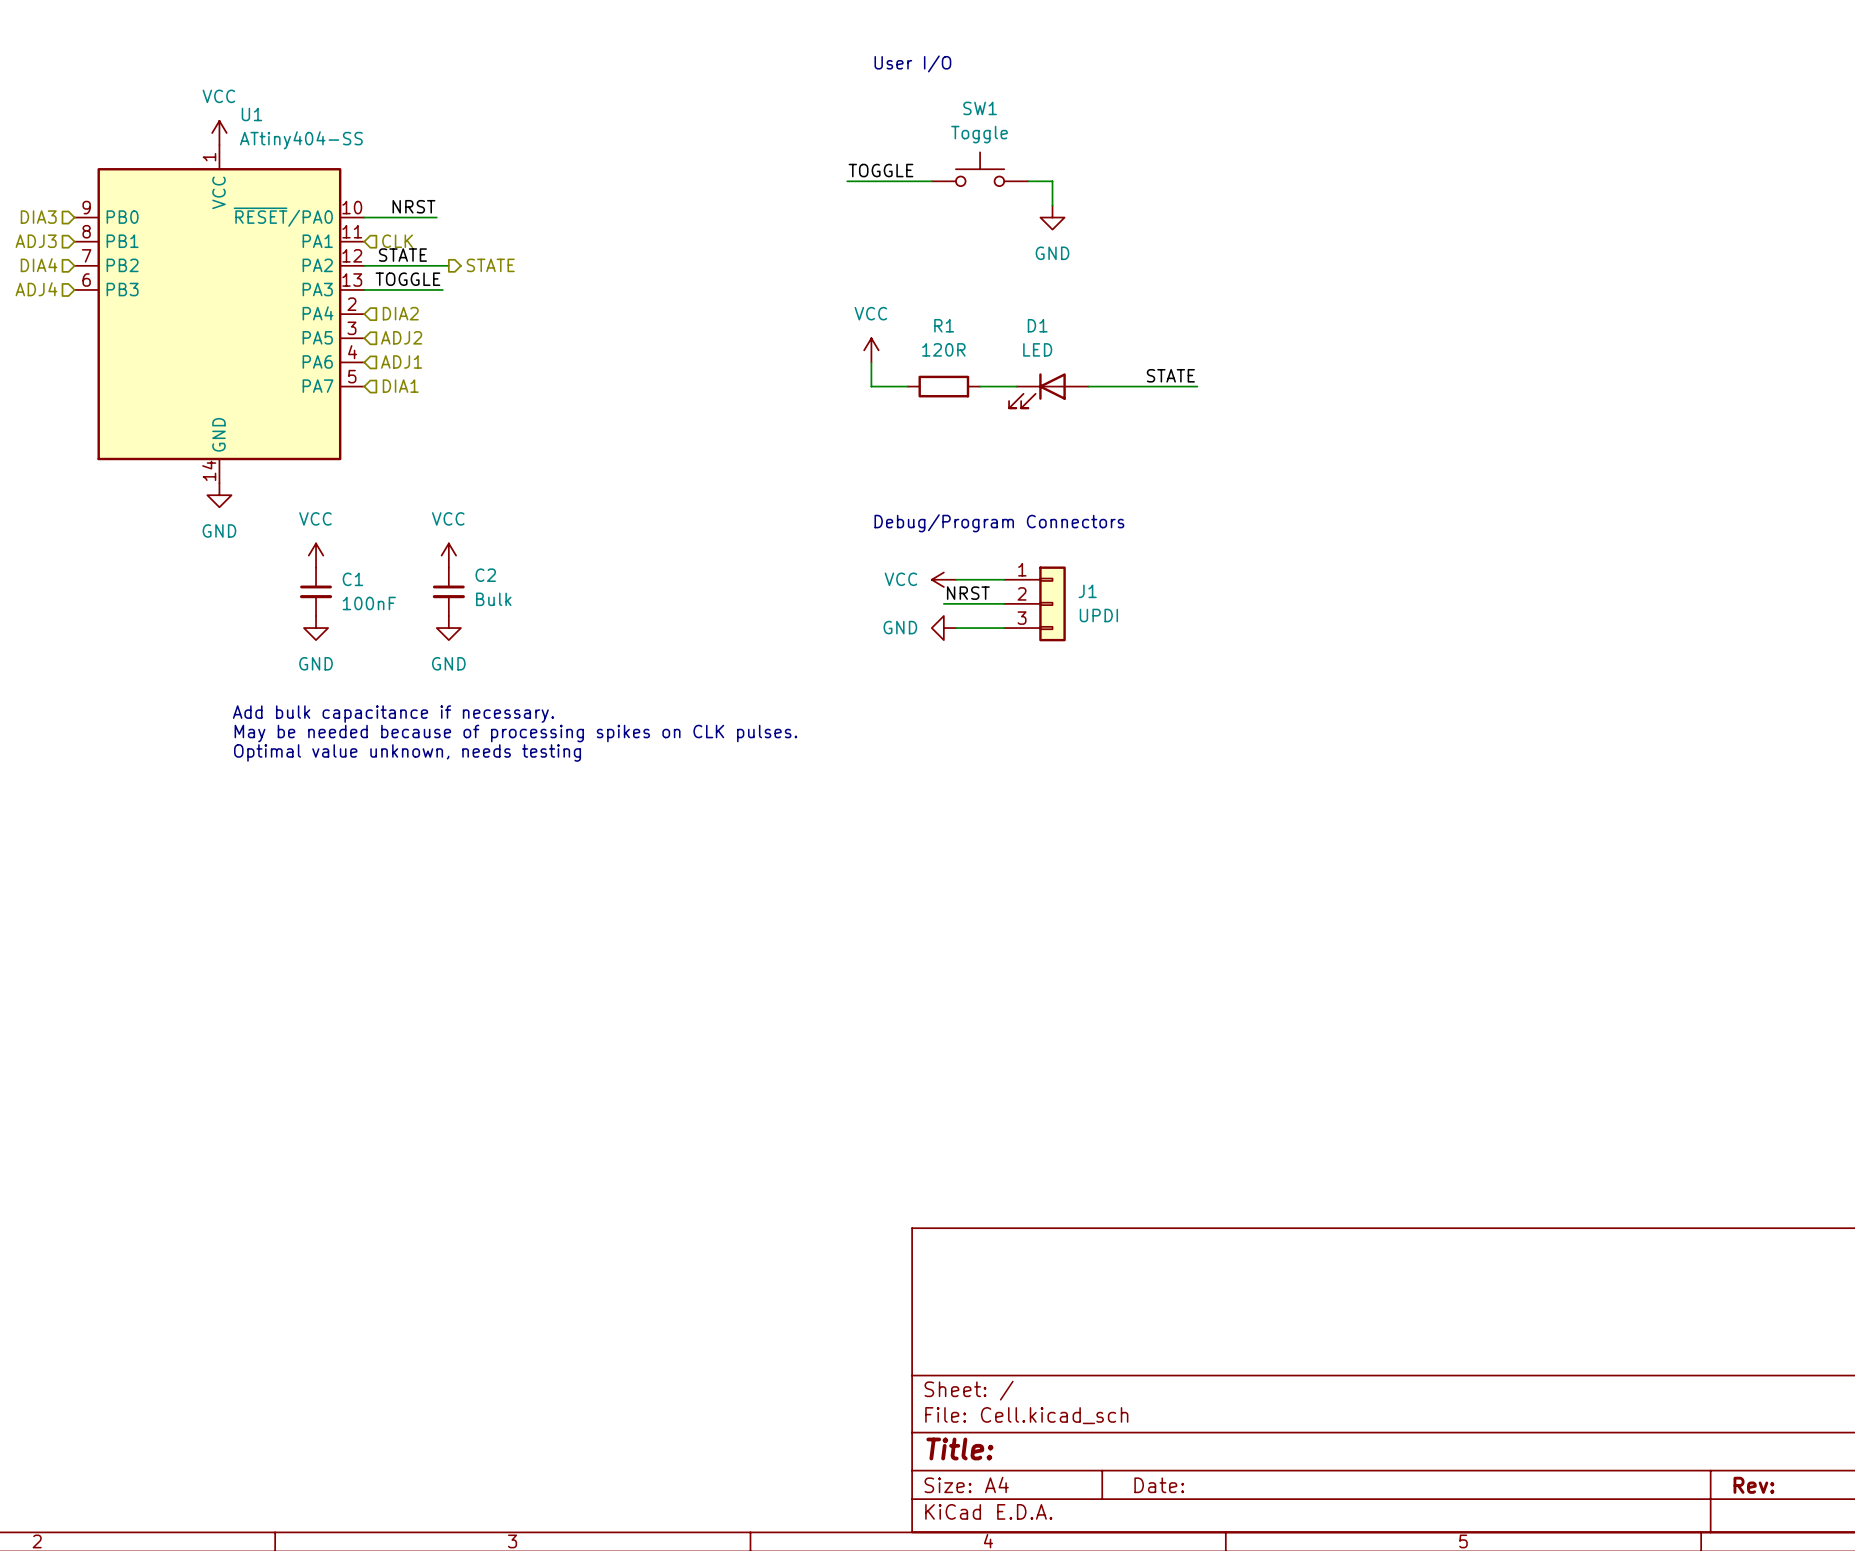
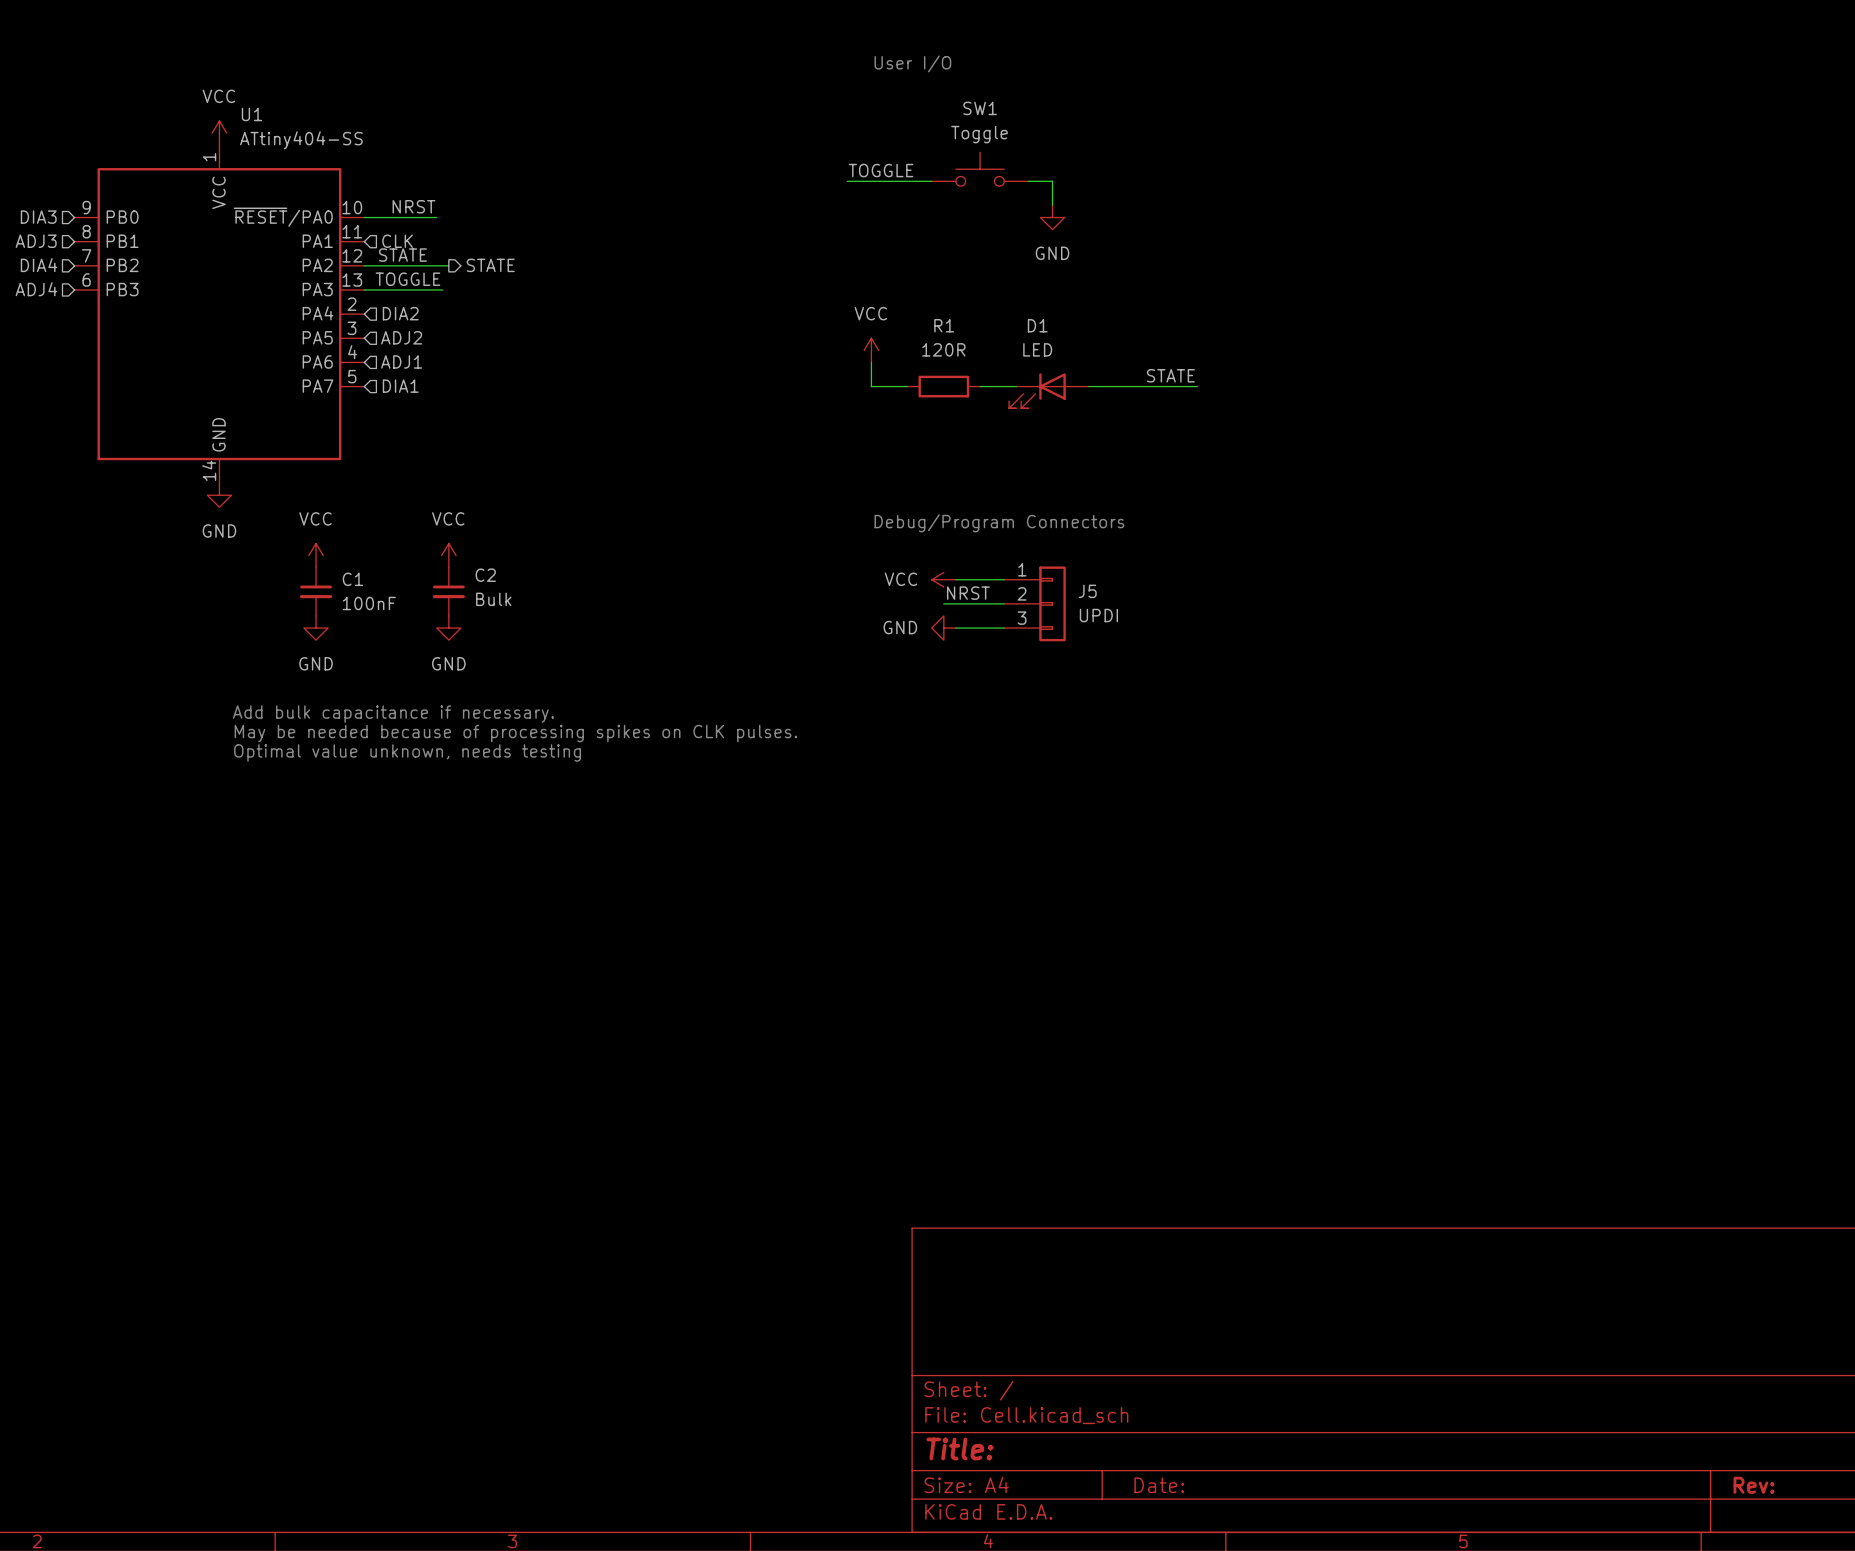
J1 name: J1 (1087, 591) -> J5 (1087, 591)

